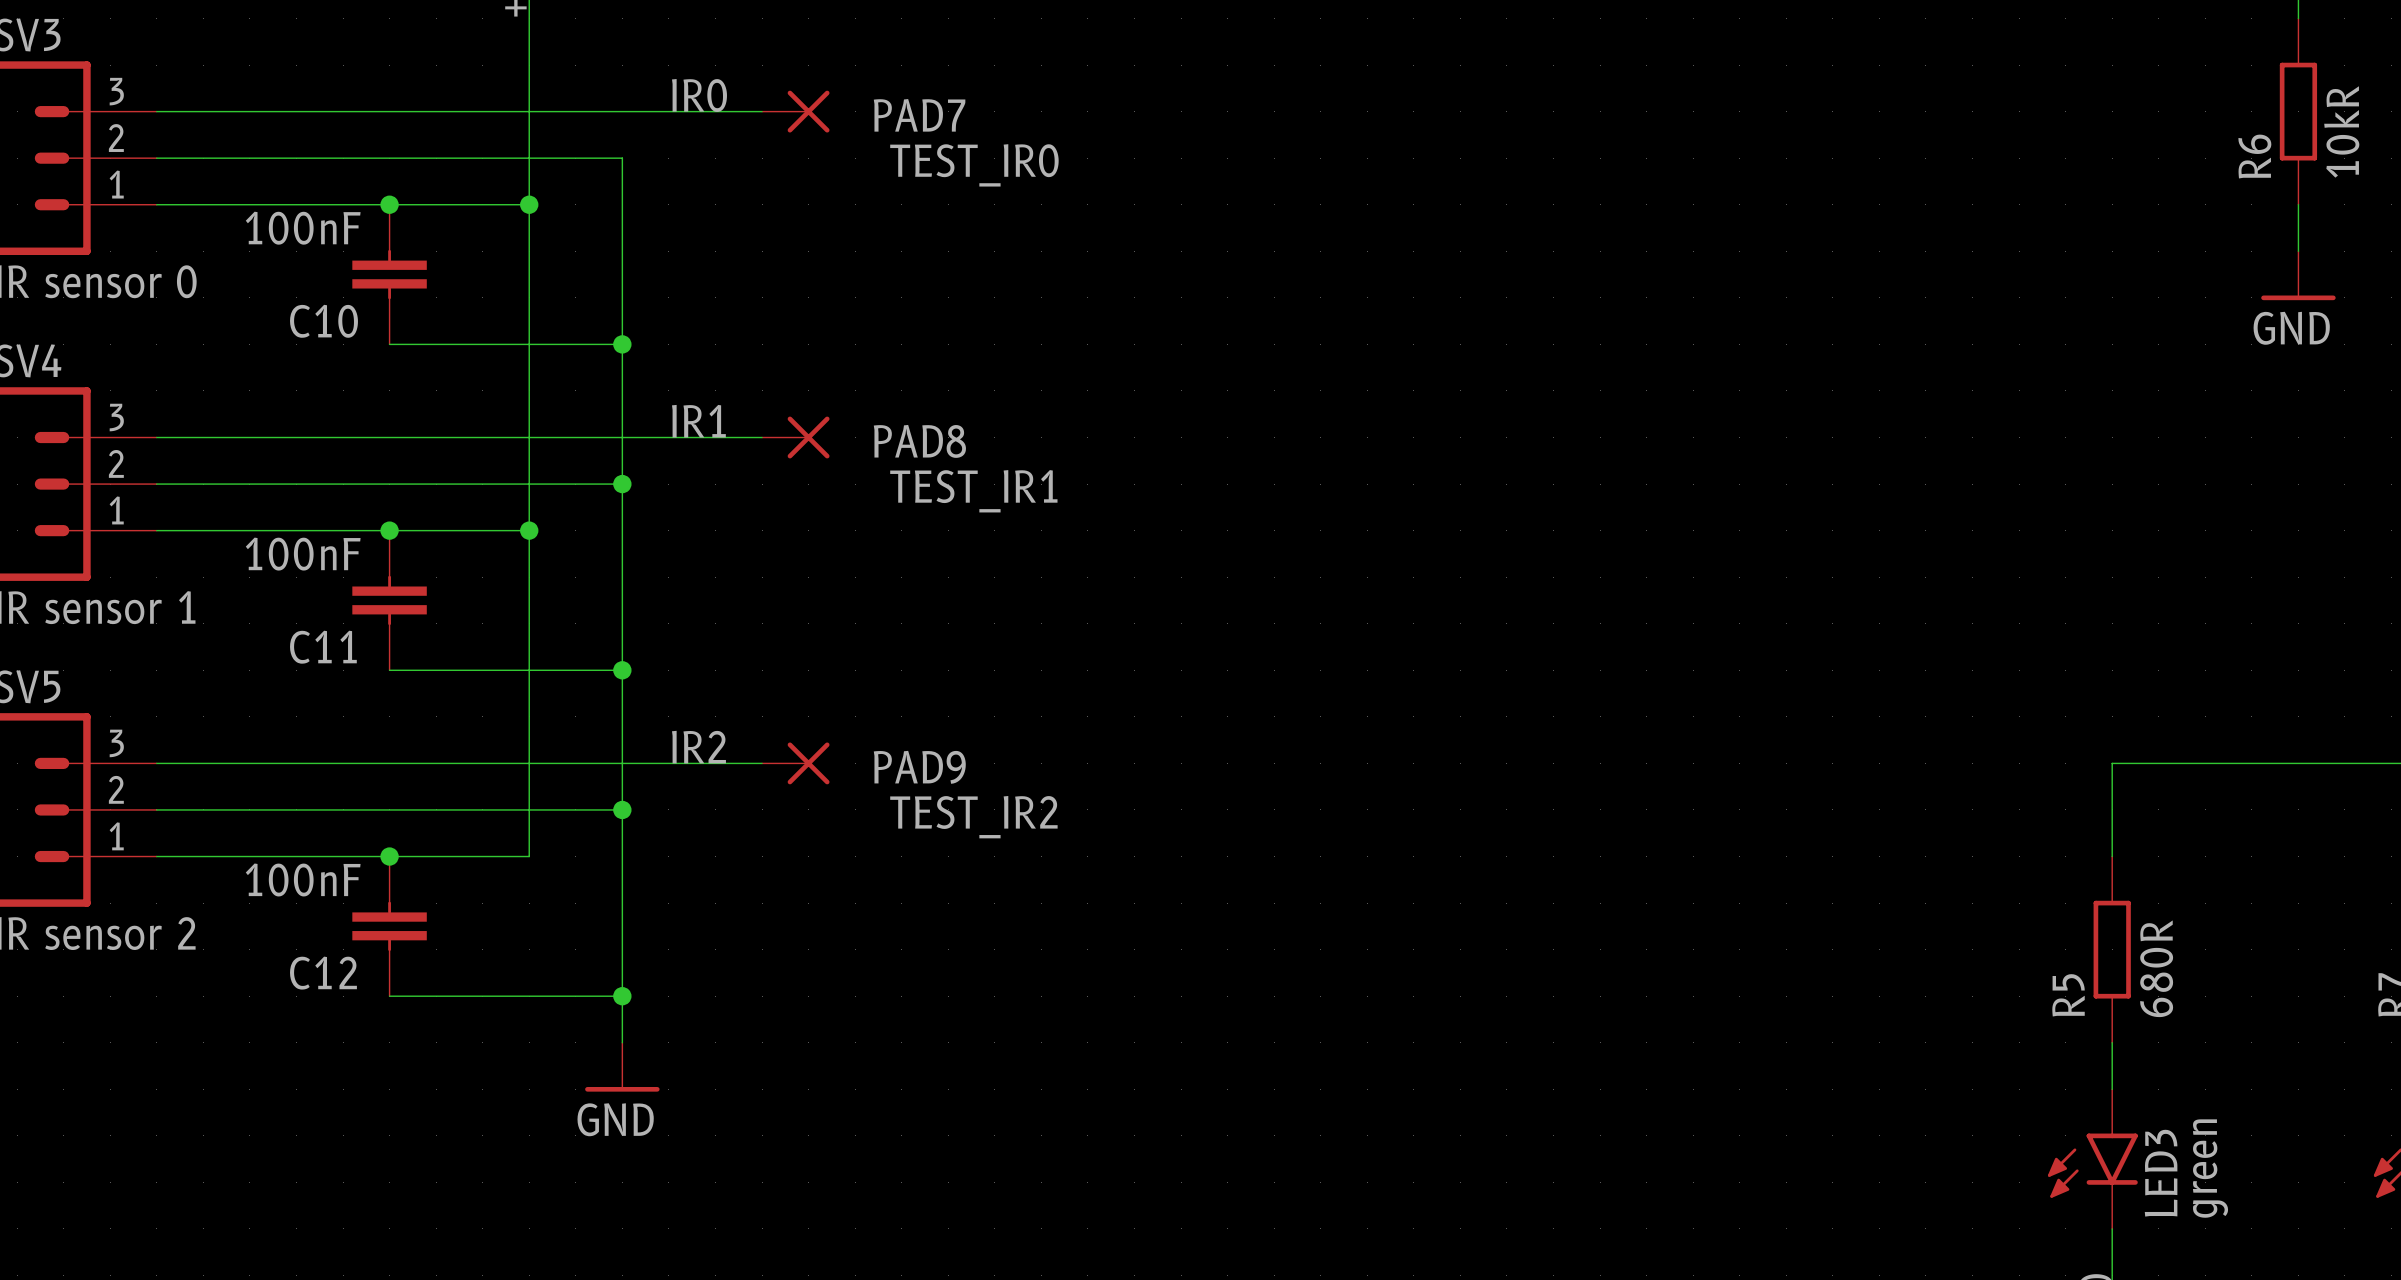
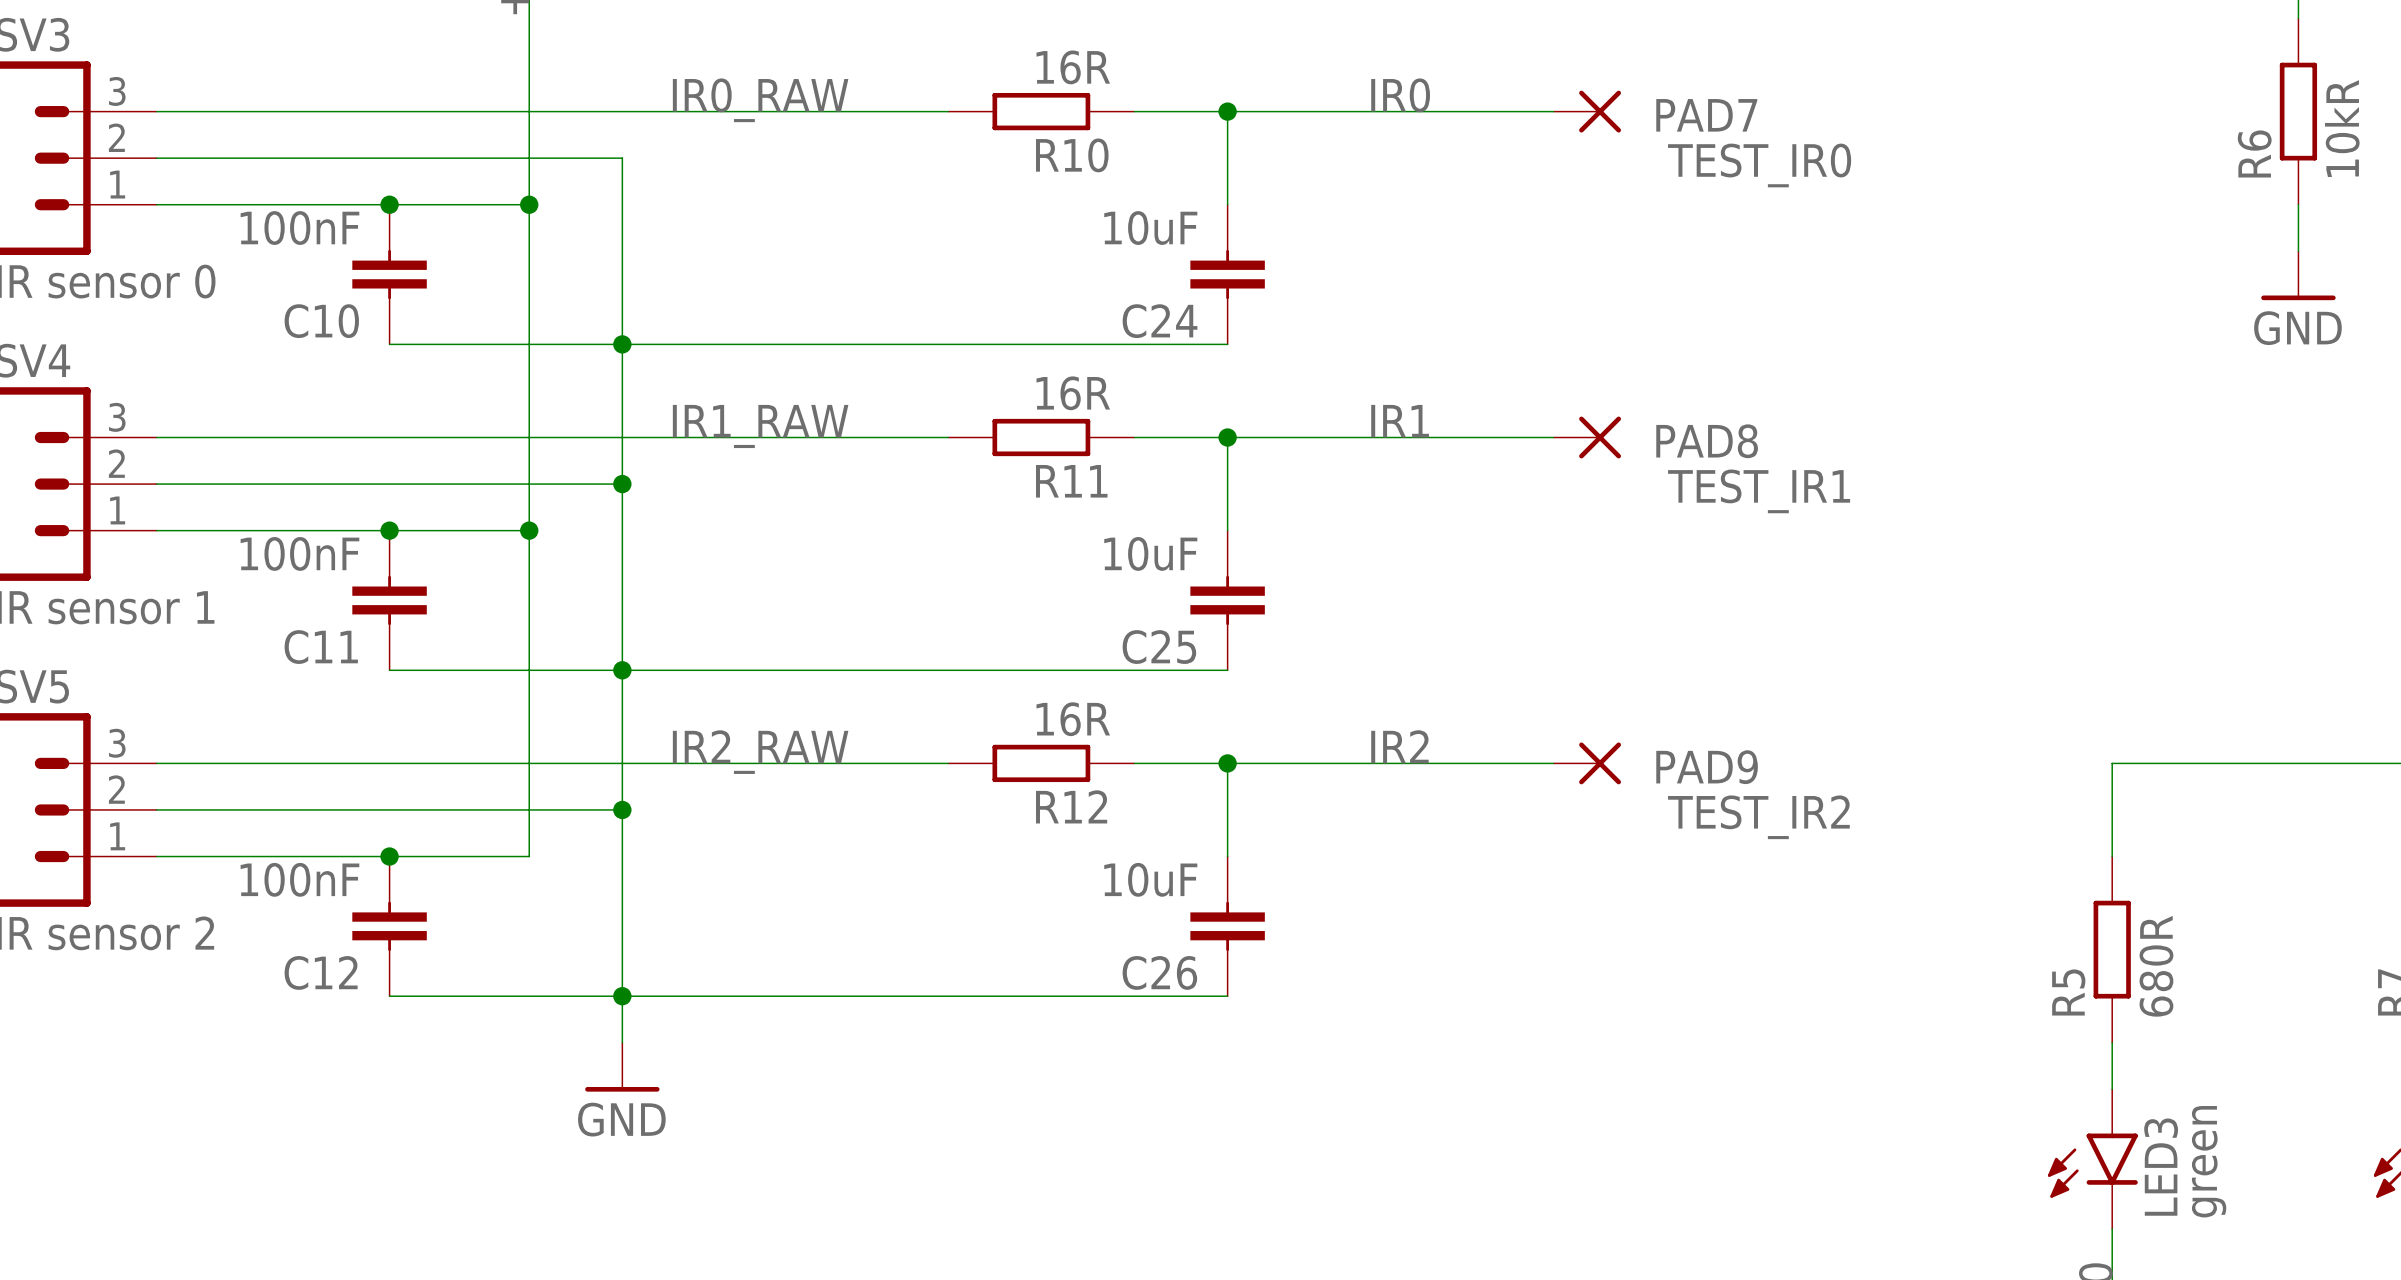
label: IR0 (699, 95) -> IR0_RAW (760, 100)
label: none -> IR0 (1400, 95)
wire: none -> (762, 111) (948, 111)
PAD7 position: (795, 111) -> (1587, 111)
R10: none -> 16R (1041, 111)
wire: none -> (1134, 111) (1553, 111)
wire: none -> (1227, 111) (1227, 204)
junction: none -> (1227, 111)
C24: none -> 10uF (1227, 274)
wire: none -> (622, 344) (1227, 344)
label: IR1 (698, 421) -> IR1_RAW (760, 426)
label: none -> IR1 (1400, 421)
wire: none -> (762, 437) (948, 437)
PAD8 position: (795, 437) -> (1587, 437)
R11: none -> 16R (1041, 437)
wire: none -> (1134, 437) (1553, 437)
wire: none -> (1227, 437) (1227, 530)
junction: none -> (1227, 437)
C25: none -> 10uF (1227, 600)
wire: none -> (622, 670) (1227, 670)
label: IR2 (698, 747) -> IR2_RAW (760, 752)
label: none -> IR2 (1399, 746)
wire: none -> (762, 763) (948, 763)
PAD9 position: (795, 763) -> (1587, 763)
R12: none -> 16R (1041, 763)
wire: none -> (1134, 763) (1553, 763)
wire: none -> (1227, 763) (1227, 856)
junction: none -> (1227, 763)
C26: none -> 10uF (1227, 926)
wire: none -> (622, 996) (1227, 996)

